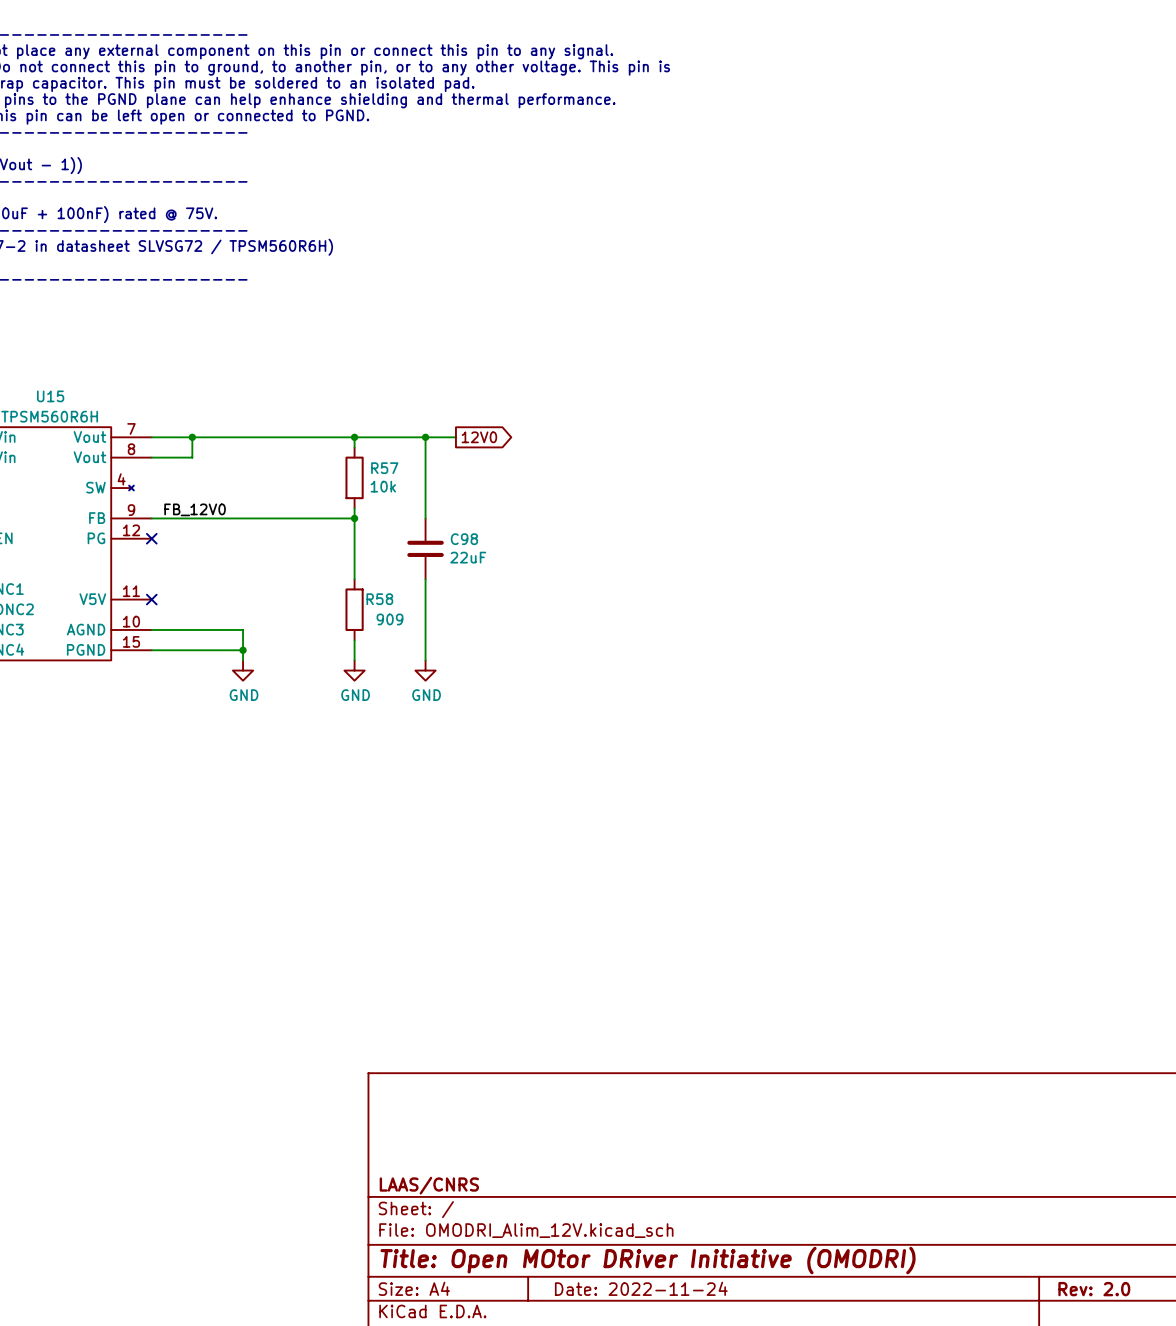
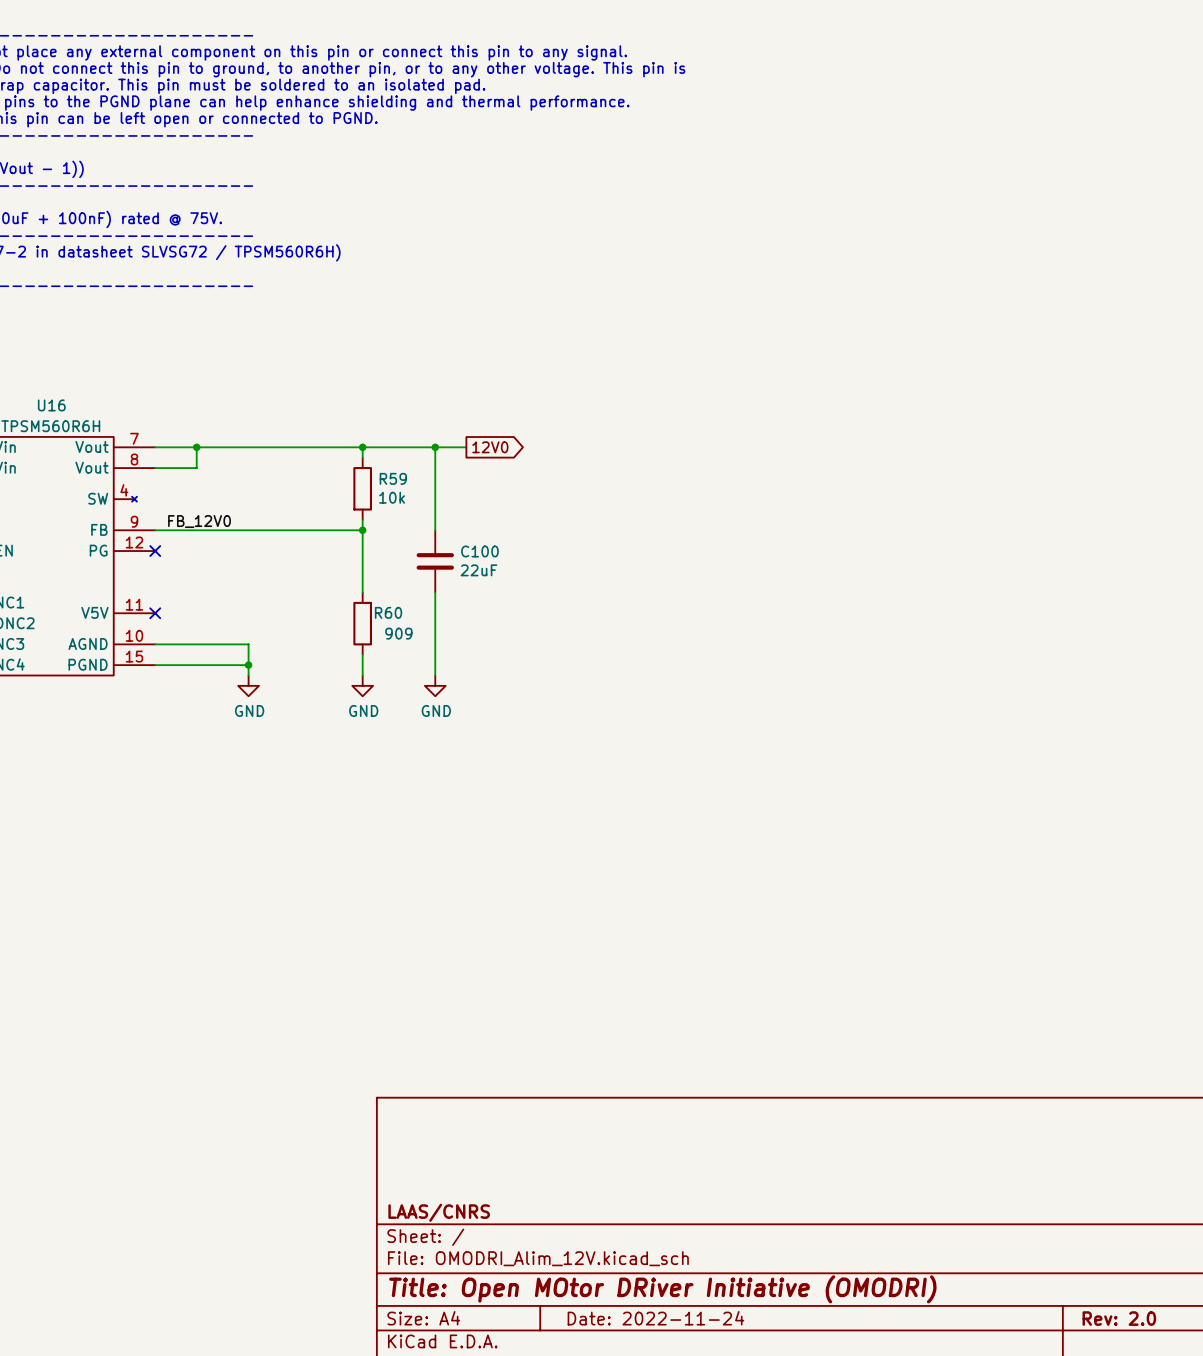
U15 name: U15 (50, 396) -> U16 (51, 405)
R57 name: R57 (384, 468) -> R59 (393, 478)
C98 name: C98 (464, 539) -> C100 (479, 551)
R58 name: R58 (379, 599) -> R60 (388, 612)

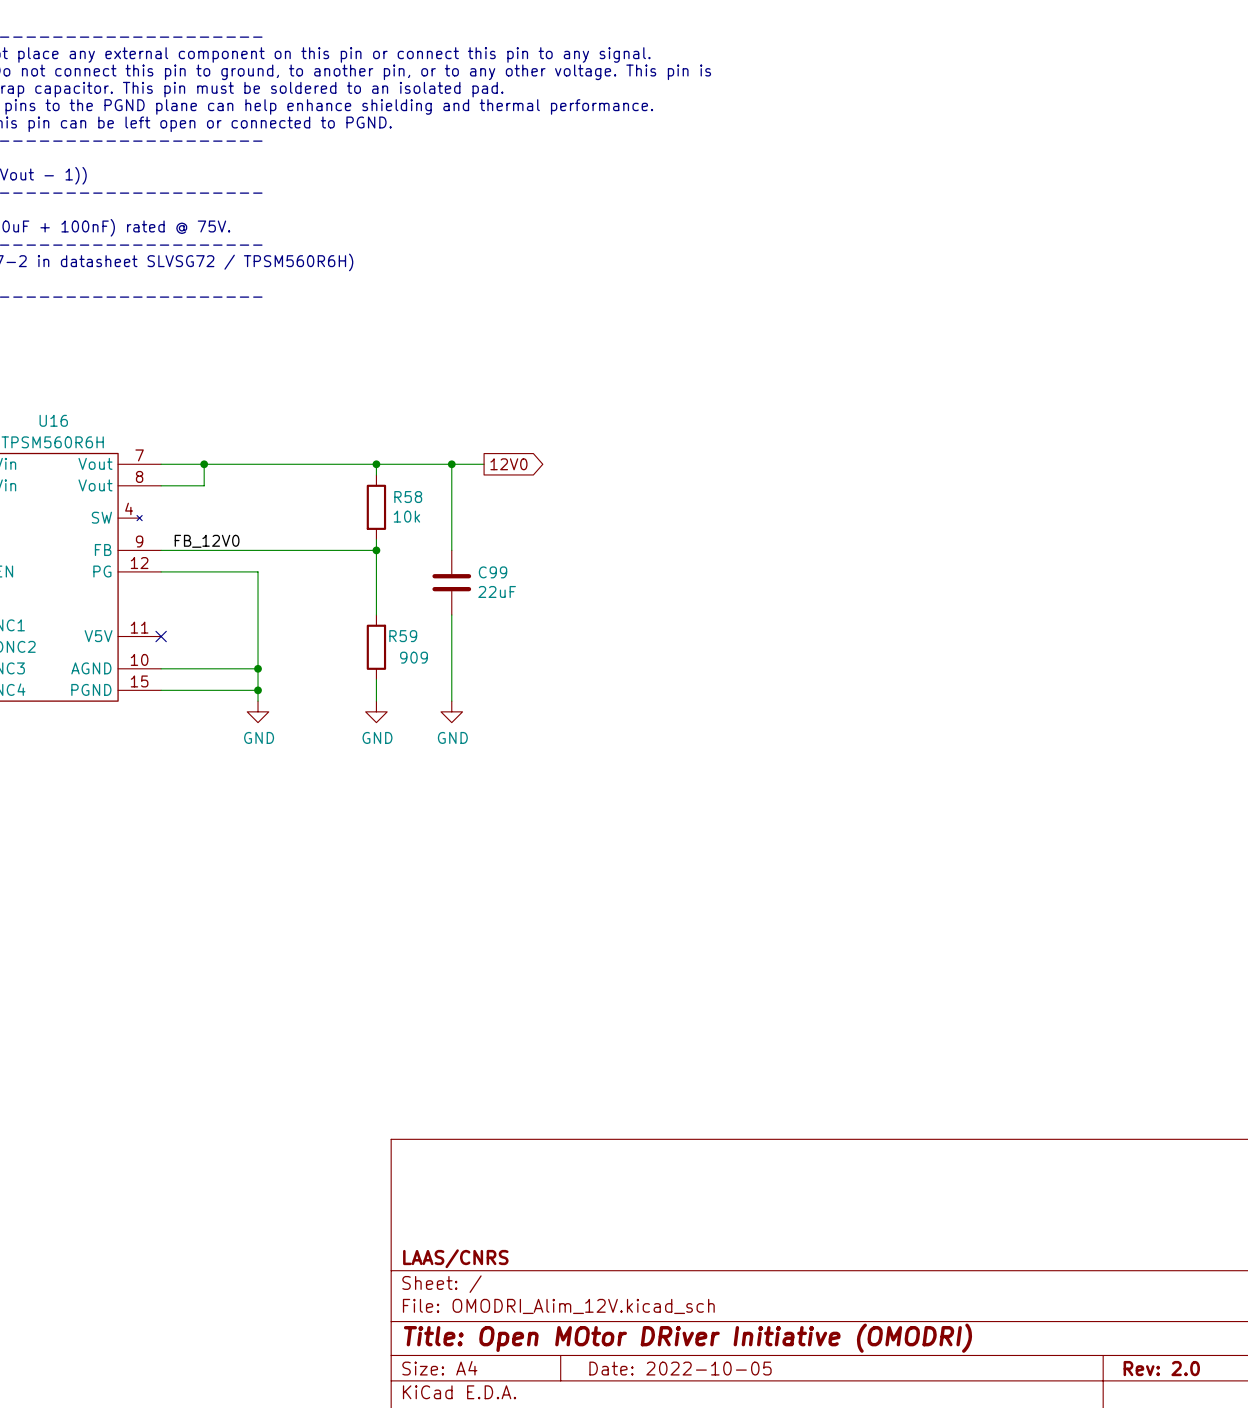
R59 name: R59 (393, 478) -> R58 (408, 497)
wire: none -> (161, 571) (258, 571) (258, 668)
no-connect mark: (155, 551) -> none
C100 name: C100 (479, 551) -> C99 (493, 572)
R60 name: R60 (388, 612) -> R59 (403, 636)
junction: none -> (258, 668)
title block: Date: 2022-11-24 (655, 1318) -> Date: 2022-10-05 (680, 1368)

